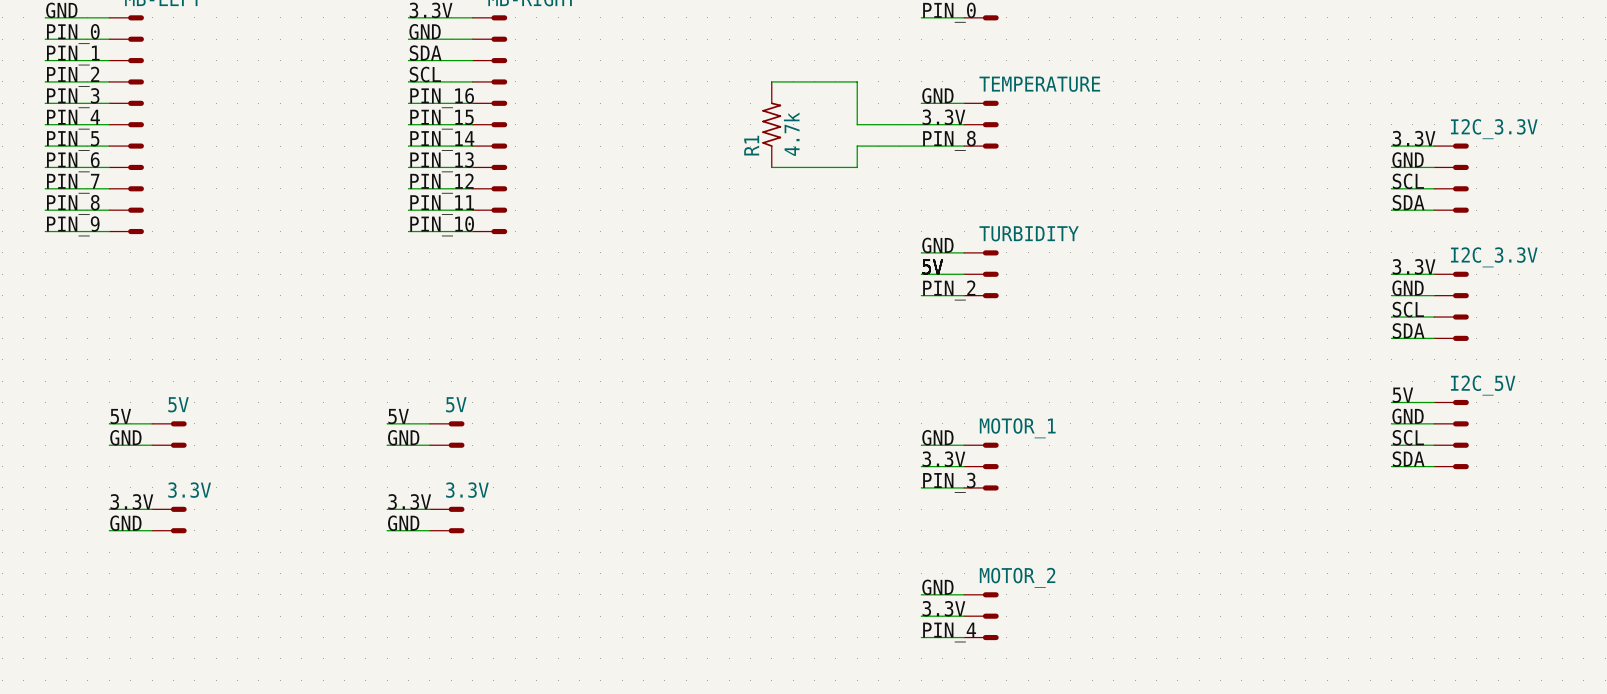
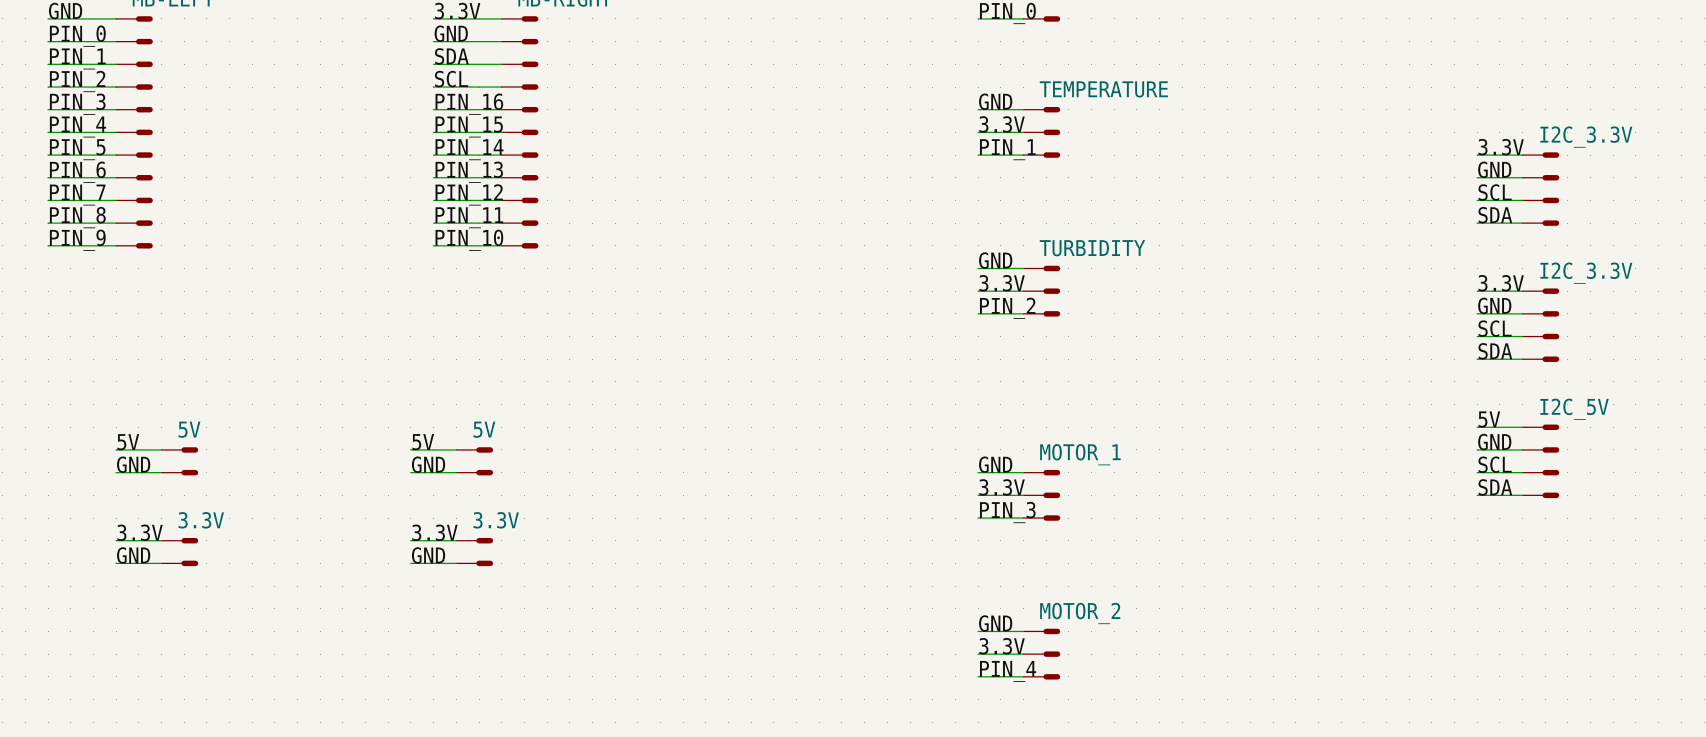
wire: (771, 81) (857, 81) (857, 124) (921, 124) -> none
R1: 4.7k (771, 124) -> none
label: PIN_8 (949, 140) -> PIN_1 (1007, 149)
wire: (921, 146) (857, 146) (857, 167) (771, 167) -> none
label: 5V (932, 266) -> 3.3V (1002, 283)

